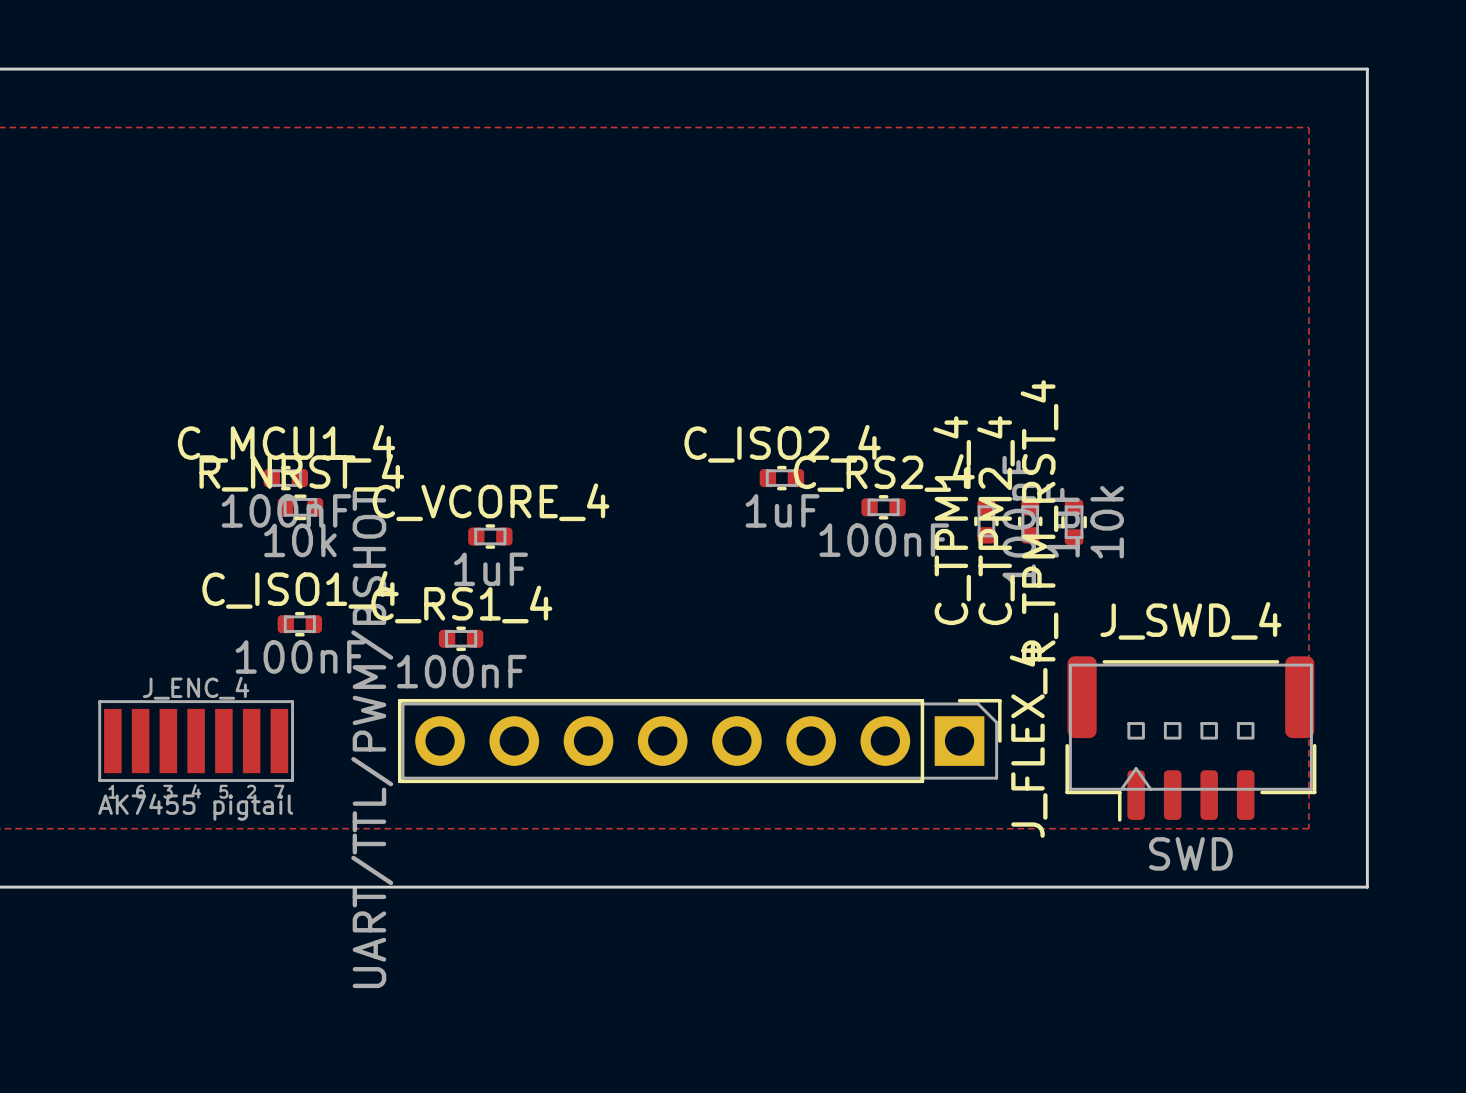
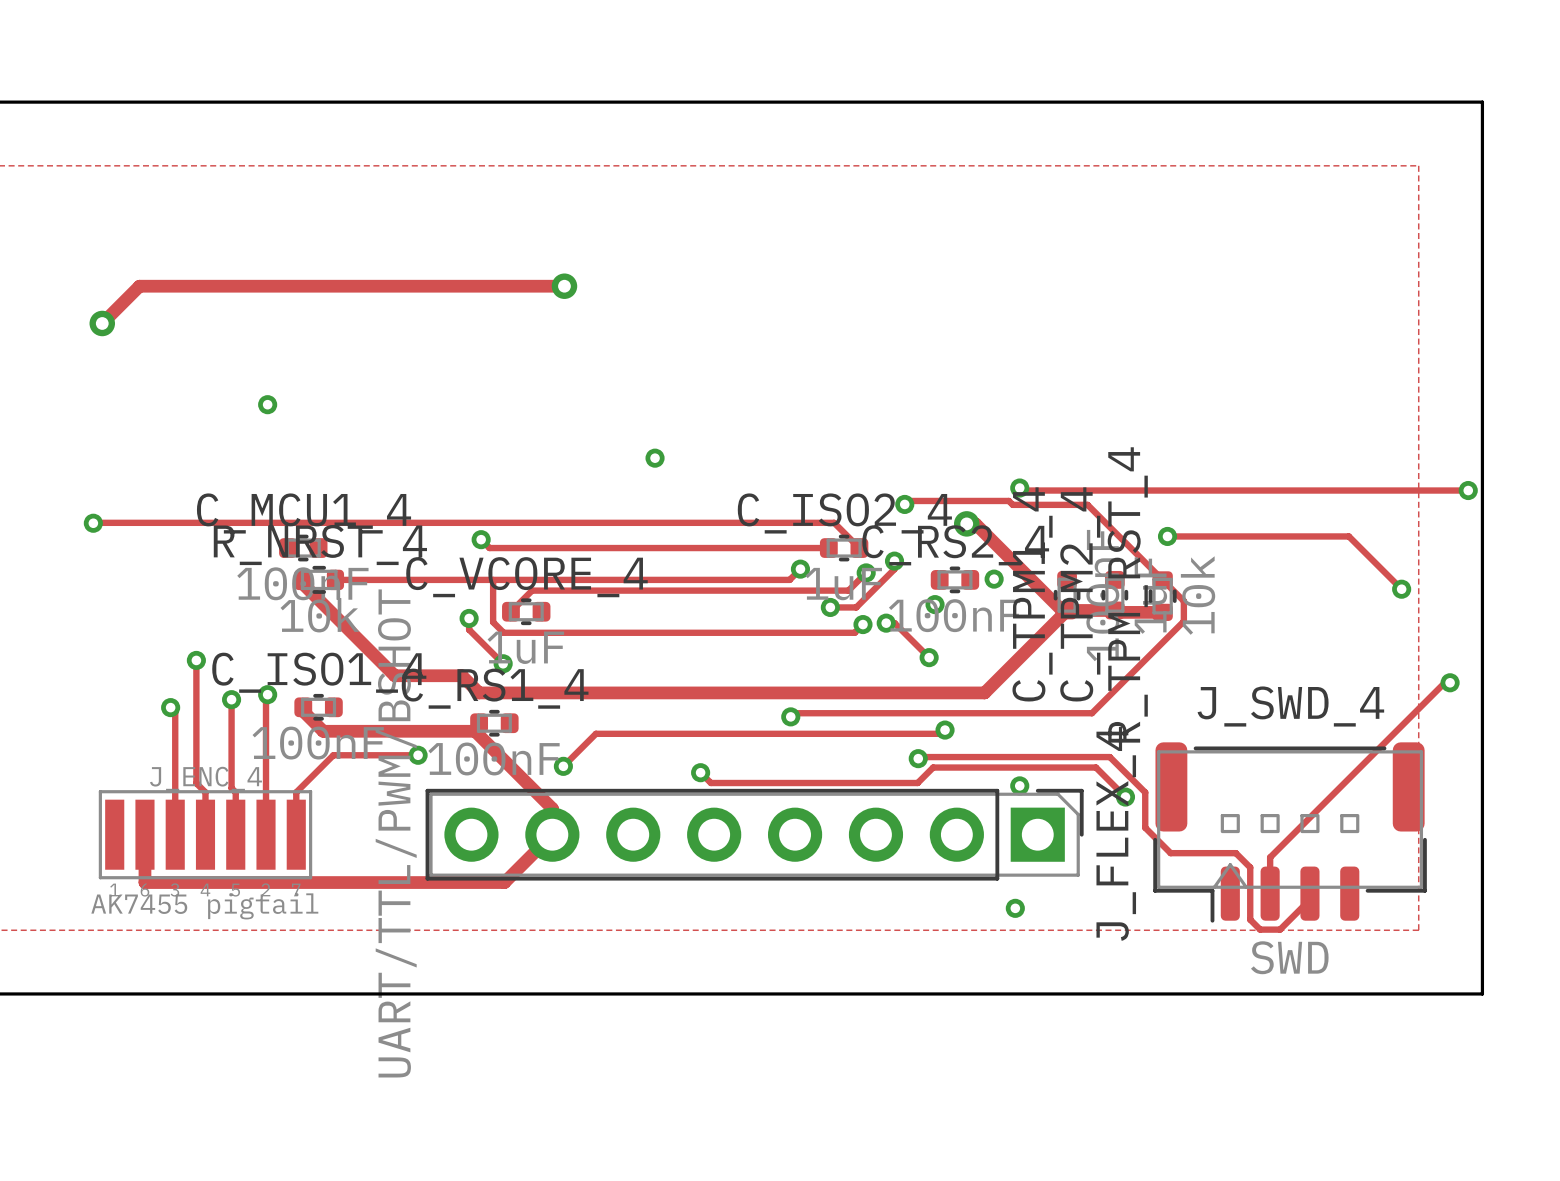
track: none -> (564, 286) (139, 286) (102, 323)
via: none -> (564, 286)
via: none -> (102, 323)
via: none -> (267, 404)
via: none -> (655, 458)
track: none -> (1019, 488) (1022, 490) (1468, 490)
via: none -> (1019, 488)
via: none -> (1468, 490)
track: none -> (904, 504) (908, 500) (1008, 500) (1012, 504) (1087, 504) (1183, 601) (1183, 621) (1091, 713) (794, 713) (790, 716)
via: none -> (904, 504)
track: none -> (93, 522) (834, 522) (859, 548)
via: none -> (93, 523)
track: none -> (966, 523) (975, 523) (1062, 610) (1162, 612)
via: none -> (966, 523)
track: none -> (1167, 536) (1348, 536) (1401, 589)
via: none -> (1167, 536)
track: none -> (481, 539) (489, 548) (828, 548)
via: none -> (481, 539)
track: none -> (894, 561) (894, 569) (856, 607) (830, 607)
via: none -> (894, 561)
track: none -> (800, 569) (789, 579) (335, 579)
via: none -> (800, 569)
track: none -> (866, 572) (848, 590) (532, 590) (510, 611)
via: none -> (866, 572)
via: none -> (994, 579)
track: none -> (493, 579) (493, 622) (503, 632) (854, 632) (862, 624)
track: none -> (300, 581) (394, 675) (461, 675) (479, 692) (984, 692) (1067, 610)
via: none -> (1401, 589)
via: none -> (935, 604)
via: none -> (830, 607)
track: none -> (469, 618) (469, 629) (503, 663)
via: none -> (469, 618)
track: none -> (886, 623) (894, 623) (929, 657)
via: none -> (886, 623)
via: none -> (862, 624)
via: none -> (929, 657)
track: none -> (196, 660) (196, 783) (205, 792) (205, 834)
via: none -> (196, 660)
via: none -> (503, 663)
track: none -> (1450, 682) (1444, 682) (1270, 857) (1270, 893)
via: none -> (1450, 682)
track: none -> (267, 694) (266, 696) (266, 834)
via: none -> (267, 694)
track: none -> (231, 699) (231, 788) (235, 792) (235, 834)
via: none -> (231, 699)
track: none -> (170, 707) (175, 712) (175, 834)
via: none -> (170, 707)
track: none -> (303, 707) (303, 711) (323, 731) (475, 731) (552, 808) (552, 834) (504, 882) (144, 882) (144, 834)
via: none -> (790, 716)
track: none -> (945, 730) (941, 733) (595, 733) (563, 766)
via: none -> (945, 730)
track: none -> (418, 755) (333, 755) (296, 792) (296, 834)
via: none -> (418, 755)
track: none -> (918, 758) (919, 757) (1109, 757) (1145, 792) (1145, 827) (1170, 853) (1235, 853) (1250, 867) (1250, 919) (1260, 929) (1280, 929) (1309, 899) (1309, 893)
via: none -> (918, 758)
via: none -> (563, 766)
track: none -> (700, 772) (710, 783) (917, 783) (933, 767) (1095, 767) (1125, 797)
via: none -> (700, 772)
via: none -> (1019, 785)
via: none -> (1125, 797)
via: none -> (1015, 908)

